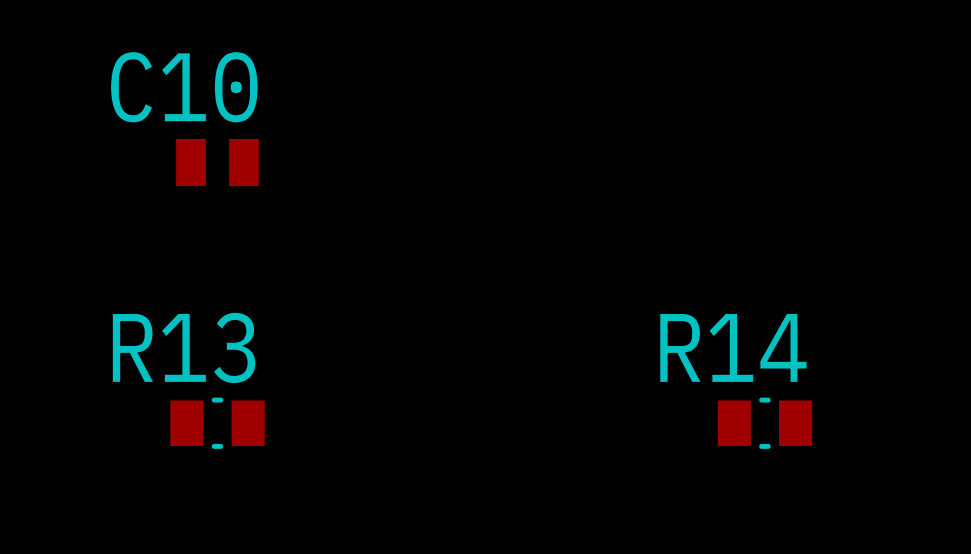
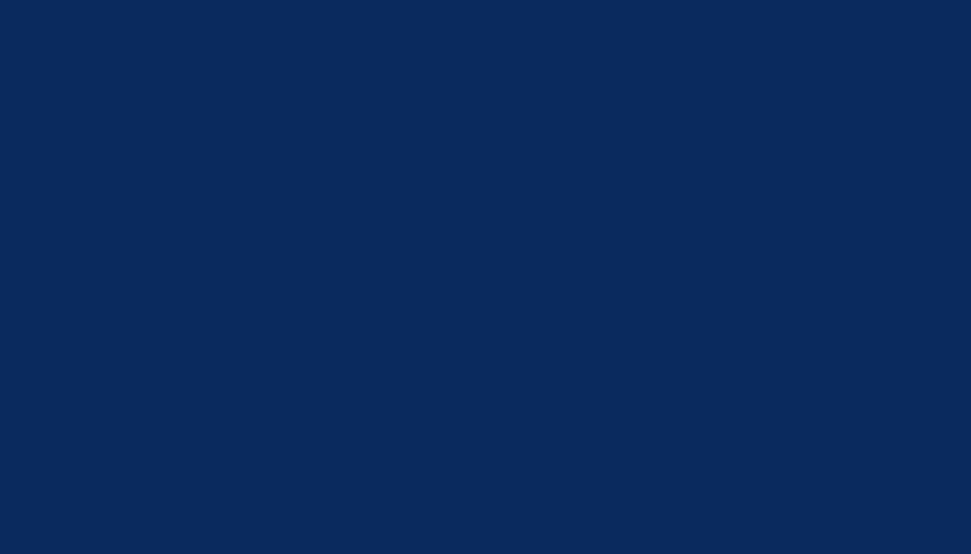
C10: (217, 162) -> none
R13: (217, 423) -> none
R14: (764, 423) -> none

